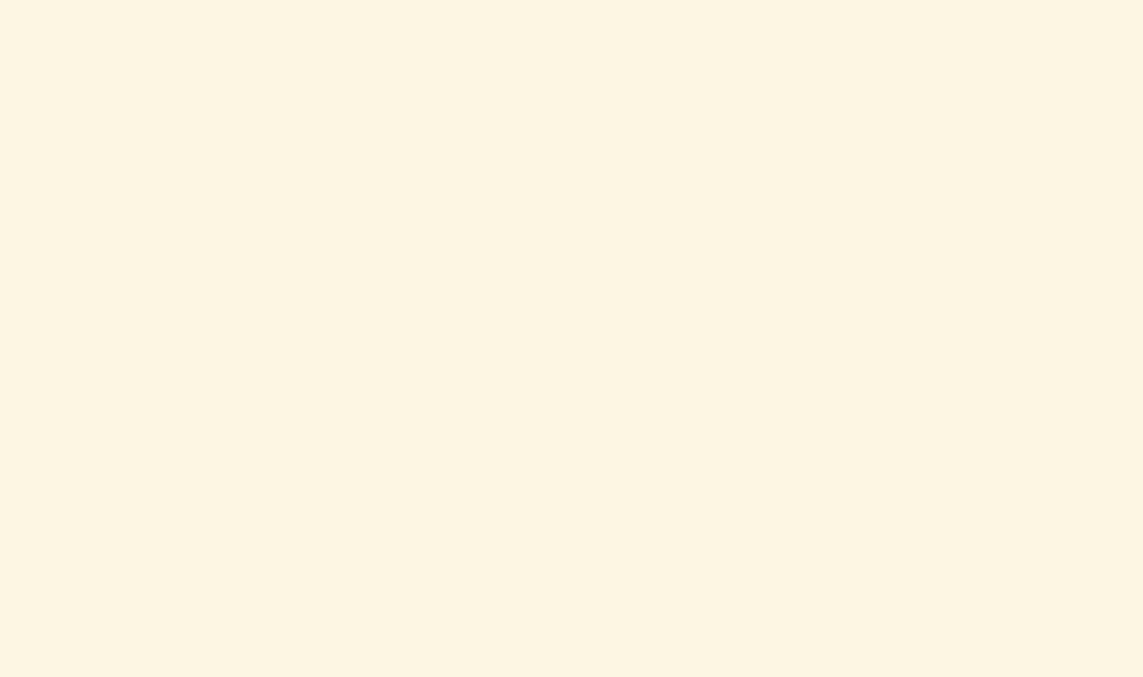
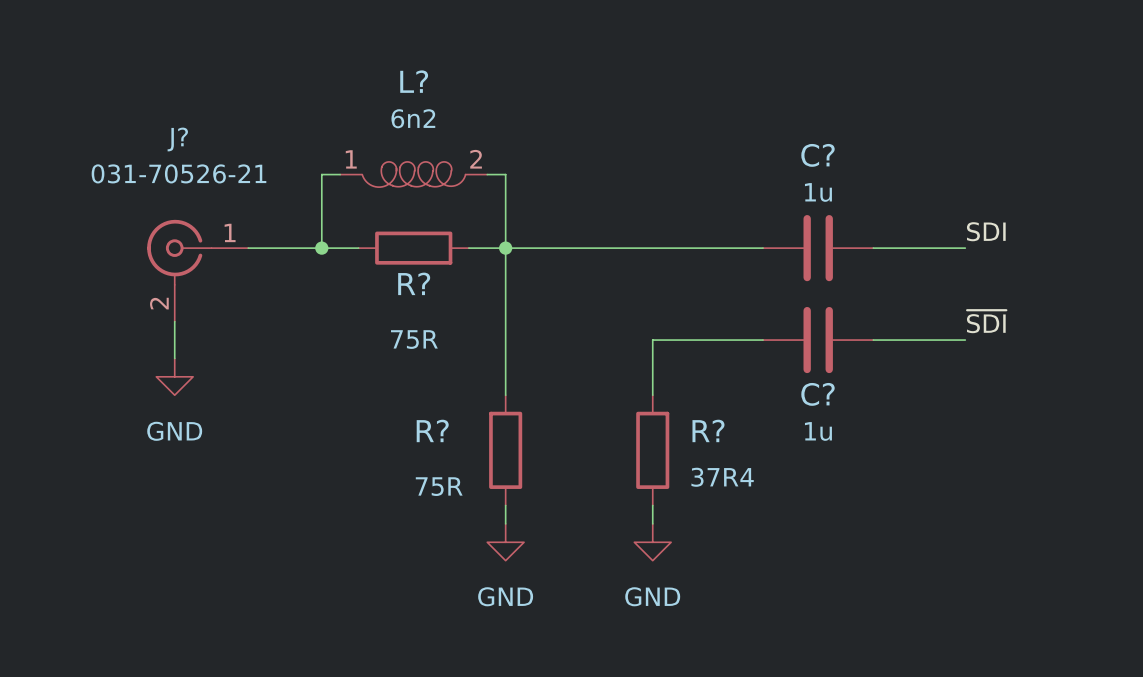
wire: none -> (340, 174) (321, 174) (321, 248)
L?: none -> (413, 174)
wire: none -> (487, 174) (505, 174) (505, 395)
label: none -> SDI (986, 231)
wire: none -> (248, 248) (358, 248)
junction: none -> (321, 248)
R?: none -> (413, 248)
wire: none -> (468, 248) (763, 248)
junction: none -> (505, 248)
C?: none -> (818, 248)
wire: none -> (873, 248) (965, 248)
J?: none -> 031-70526-21 (197, 270)
wire: none -> (174, 321) (174, 358)
label: none -> ~{SDI} (986, 321)
wire: none -> (763, 340) (652, 340) (652, 395)
C?: none -> (818, 340)
wire: none -> (873, 340) (965, 340)
power symbol: none -> GND (174, 376)
R?: none -> (505, 450)
R?: none -> (652, 450)
wire: none -> (505, 505) (505, 523)
wire: none -> (652, 505) (652, 523)
power symbol: none -> GND (505, 542)
power symbol: none -> GND (652, 542)

